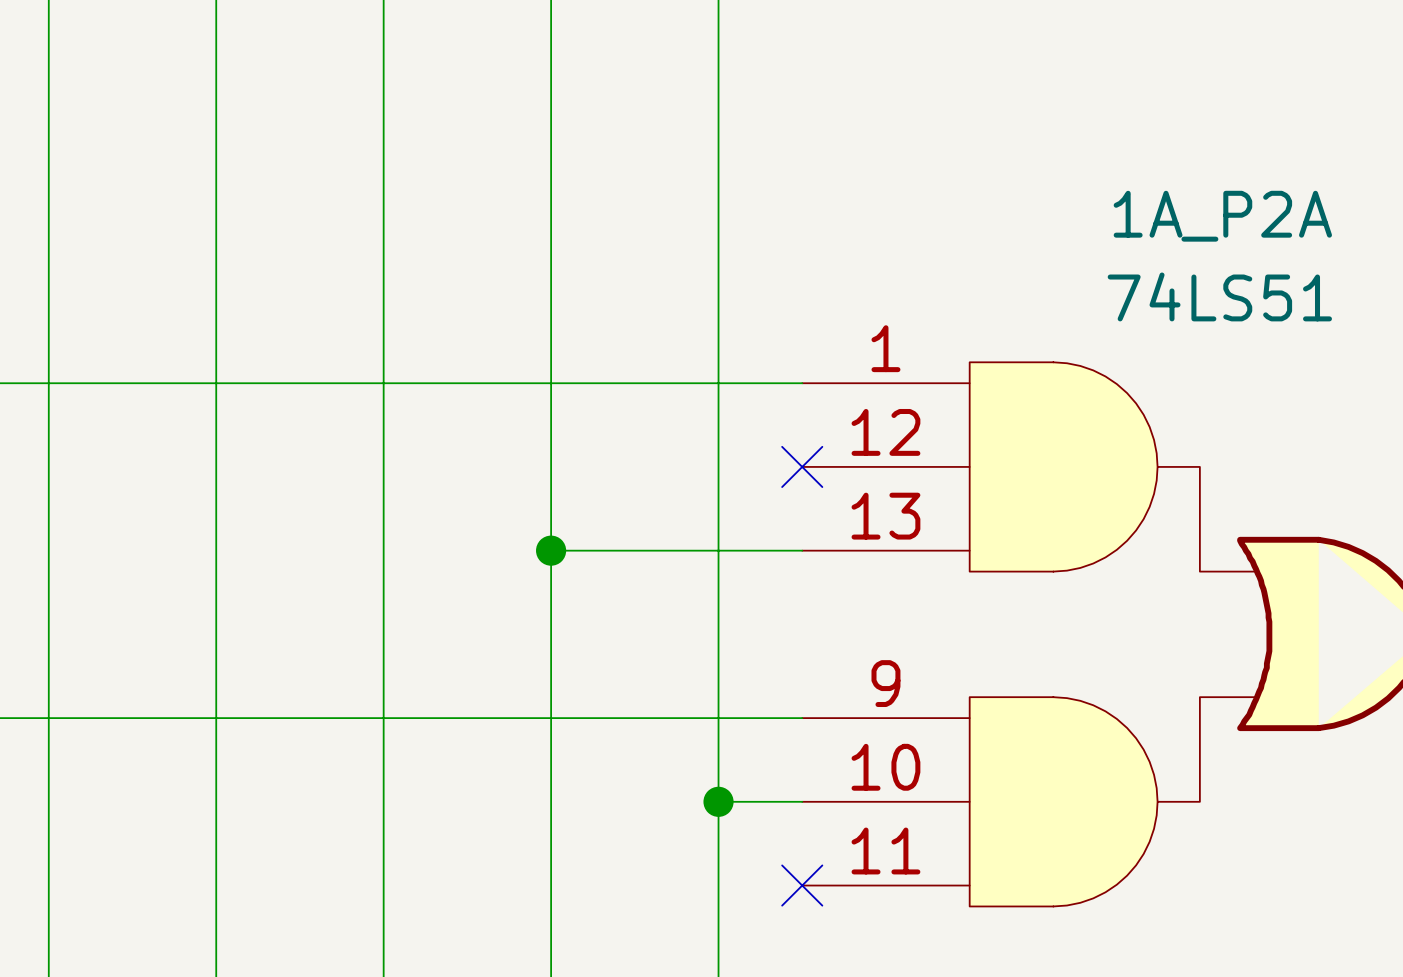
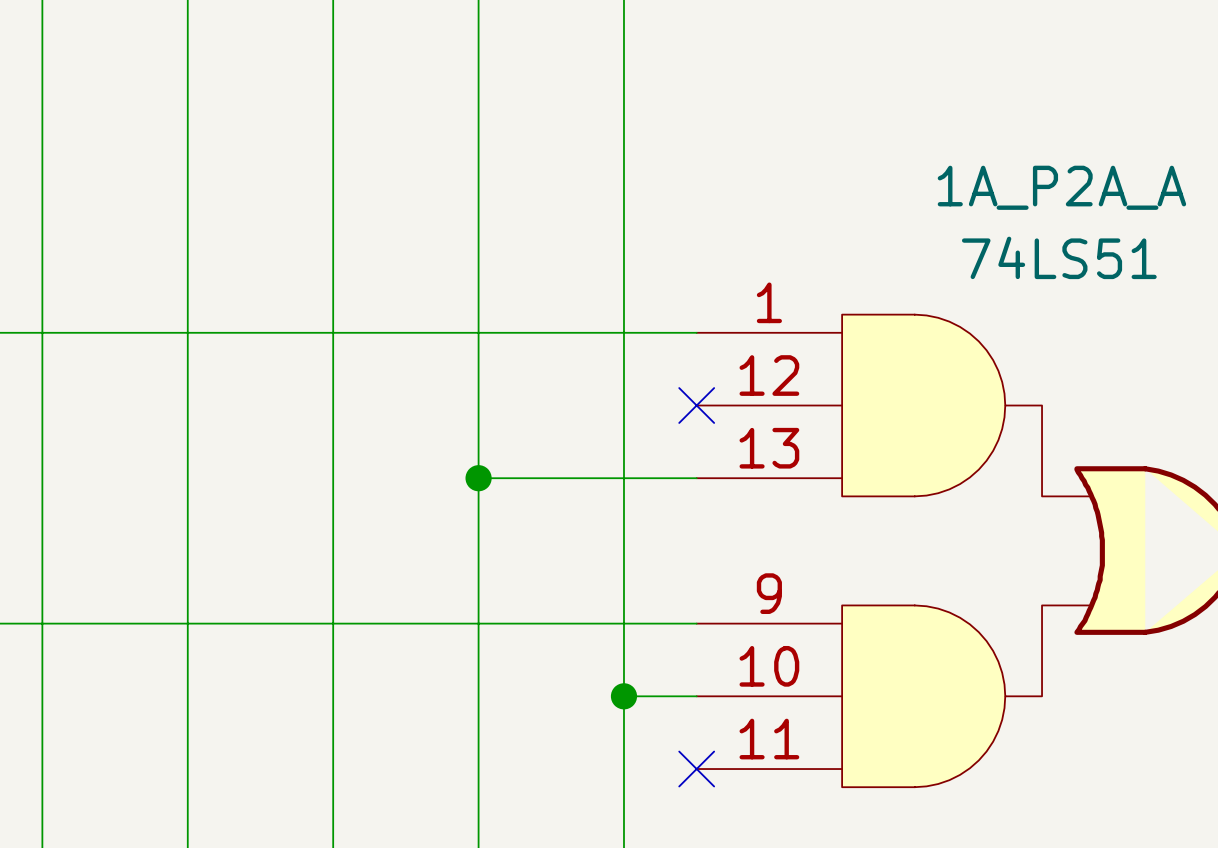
1A_P2A name: 1A_P2A (1222, 216) -> 1A_P2A_A (1061, 187)

